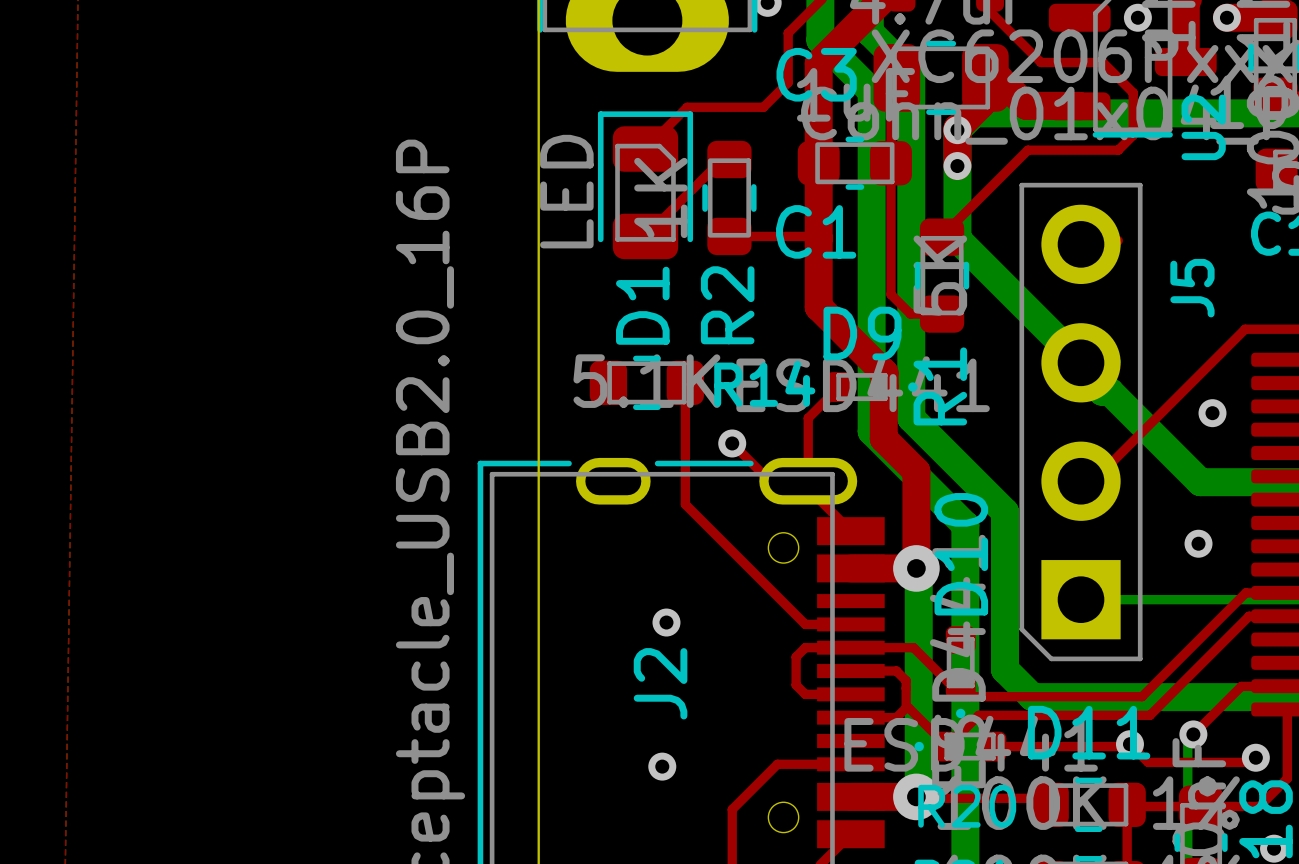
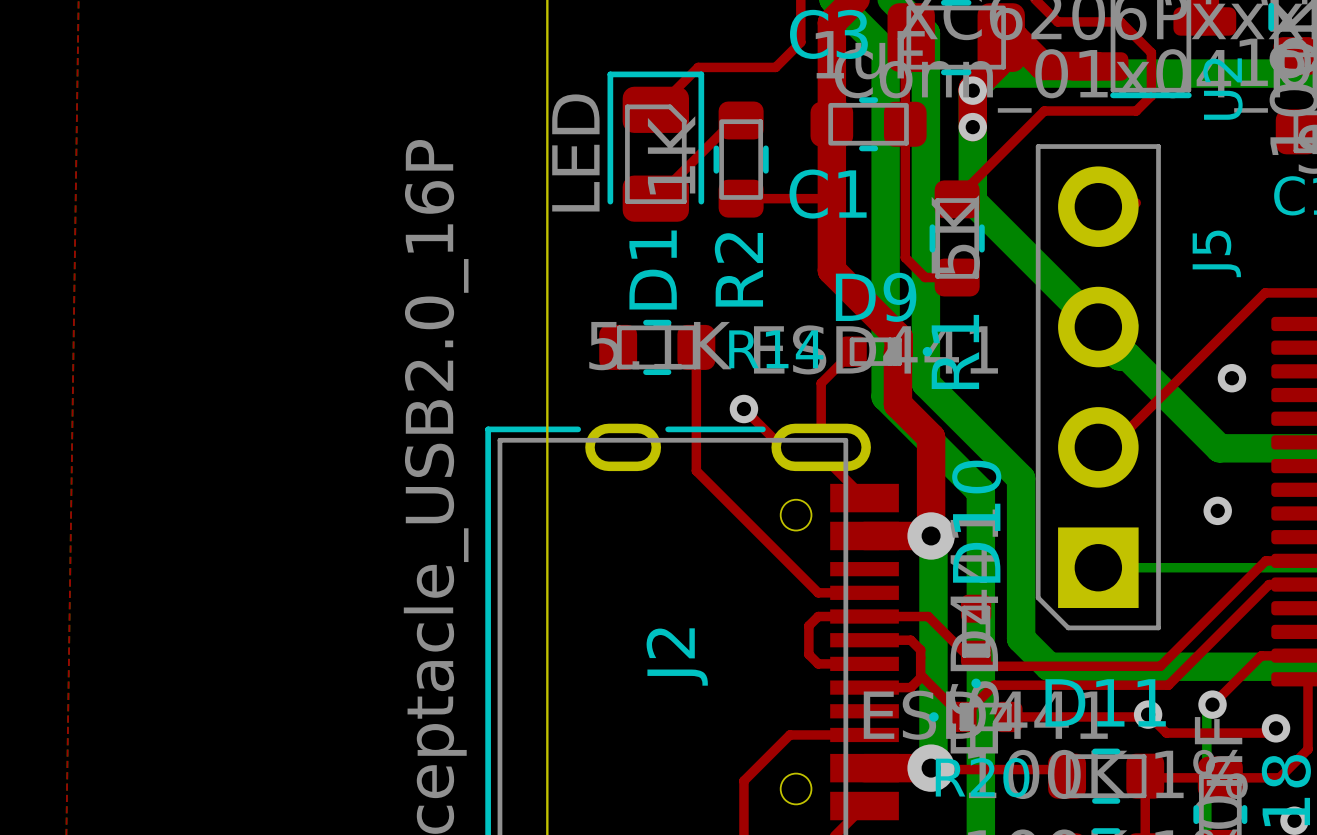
via: (666, 622) -> none
via: (662, 766) -> none

